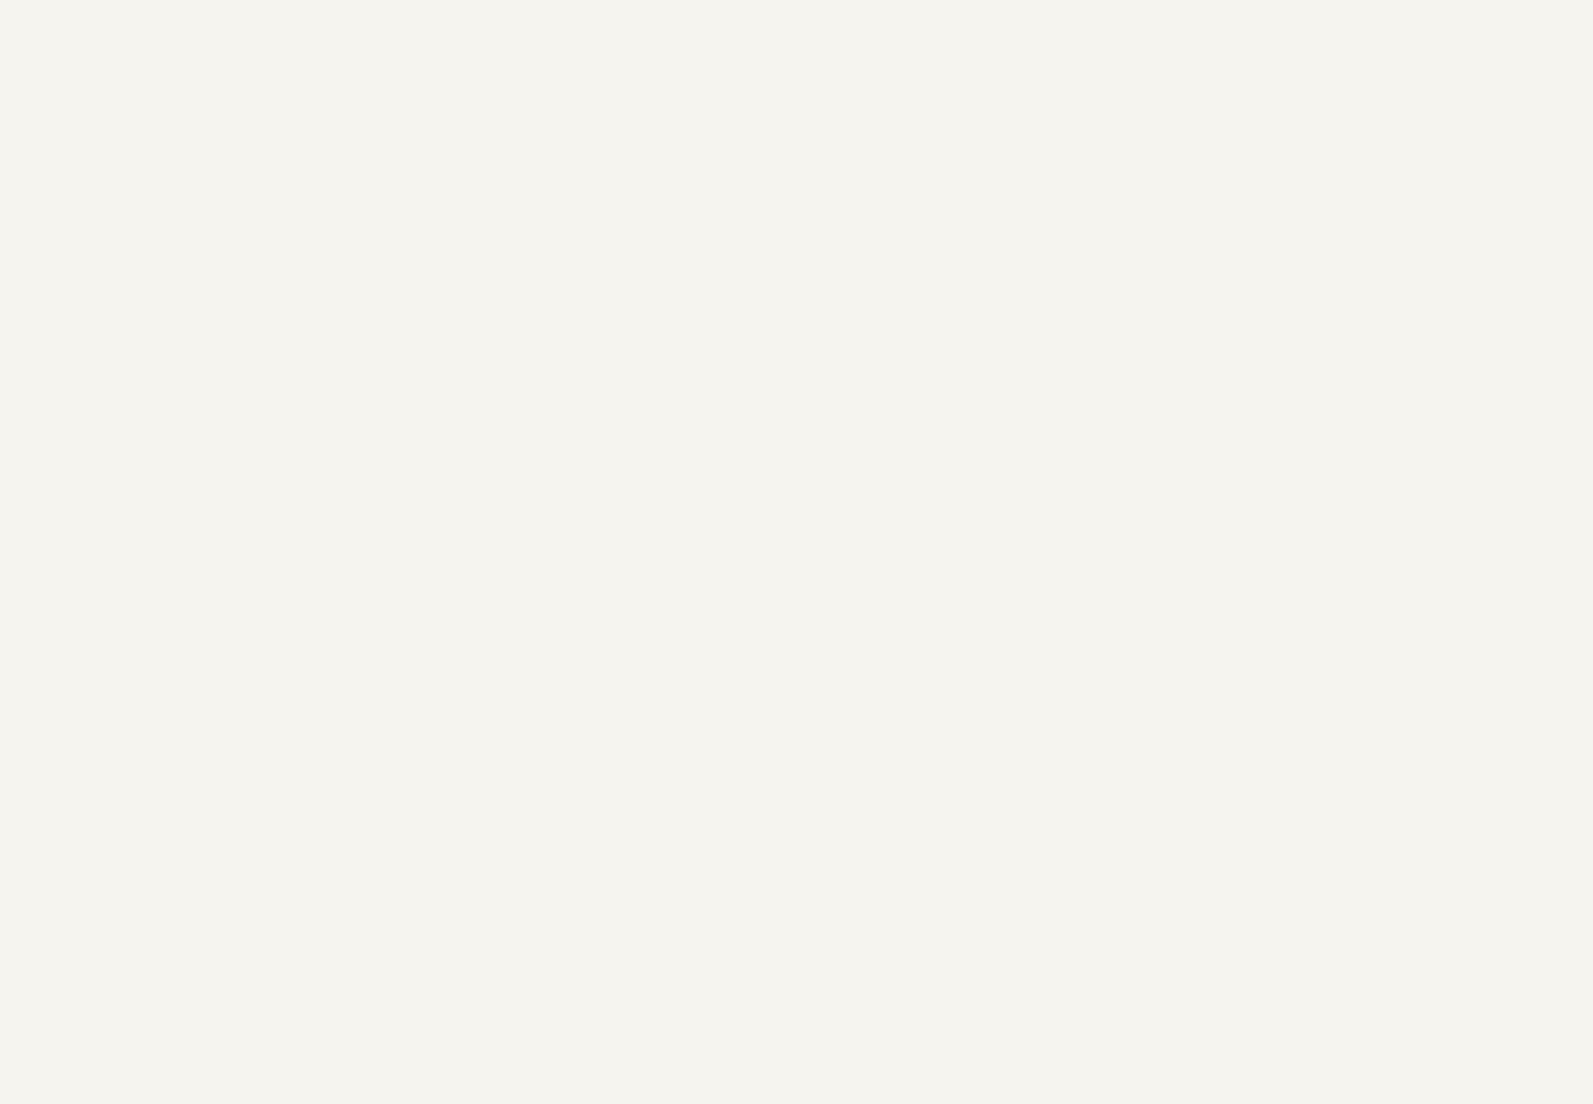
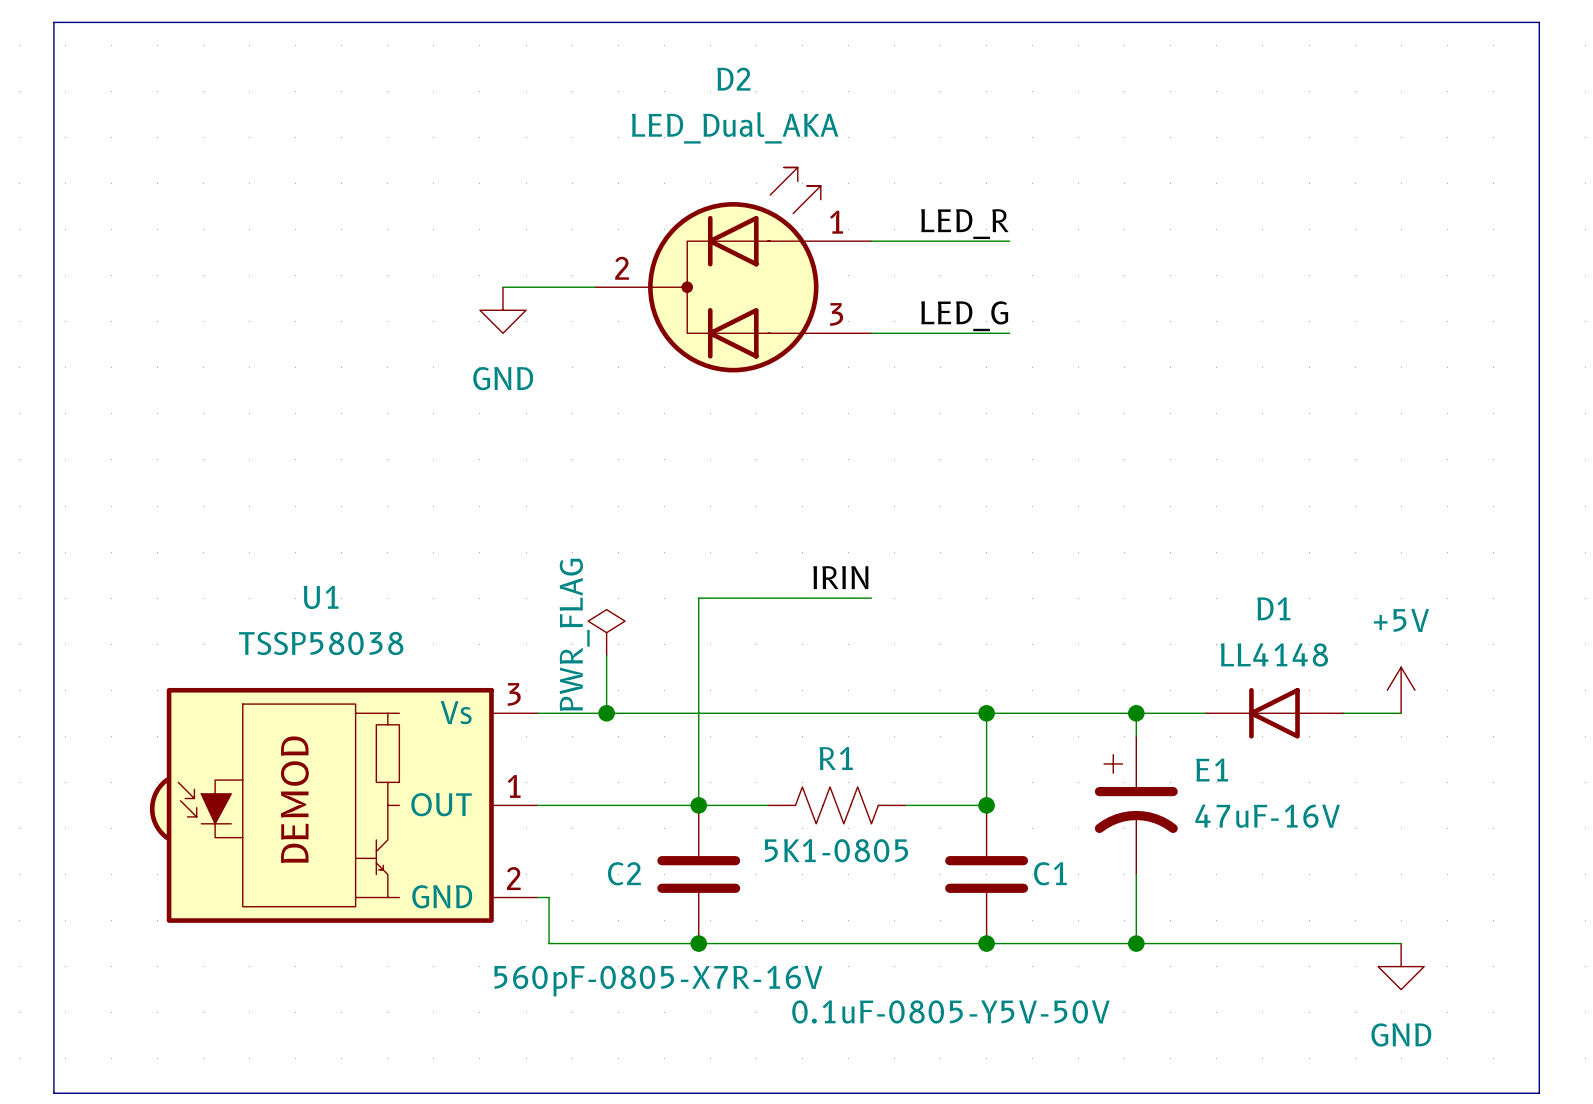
line: none -> (53, 22) (53, 1093) (1539, 1093) (1539, 22) (53, 22)
label: none -> LED_R (964, 224)
wire: none -> (871, 241) (1009, 241)
D2: none -> LED_Dual_AKA (733, 269)
wire: none -> (502, 287) (595, 287)
power symbol: none -> GND (502, 310)
label: none -> LED_G (964, 316)
wire: none -> (871, 333) (1009, 333)
label: none -> IRIN (840, 577)
wire: none -> (871, 598) (698, 598) (698, 805)
power symbol: none -> PWR_FLAG (606, 632)
wire: none -> (606, 655) (606, 713)
power symbol: none -> +5V (1401, 690)
wire: none -> (537, 713) (1205, 713)
junction: none -> (606, 713)
wire: none -> (986, 713) (986, 805) (906, 805)
junction: none -> (986, 713)
wire: none -> (1136, 713) (1136, 736)
junction: none -> (1136, 713)
D1: none -> LL4148 (1274, 713)
wire: none -> (1343, 713) (1401, 713)
U1: none -> TSSP58038 (343, 805)
wire: none -> (537, 805) (767, 805)
junction: none -> (698, 805)
R1: none -> 5K1-0805 (836, 805)
junction: none -> (986, 805)
E1: none -> 47uF-16V (1136, 805)
C2: none -> 560pF-0805-X7R-16V (698, 874)
C1: none -> 0.1uF-0805-Y5V-50V (986, 874)
wire: none -> (1136, 874) (1136, 943)
wire: none -> (537, 897) (549, 897) (549, 943) (1401, 943)
junction: none -> (698, 943)
junction: none -> (986, 943)
junction: none -> (1136, 943)
power symbol: none -> GND (1401, 966)

